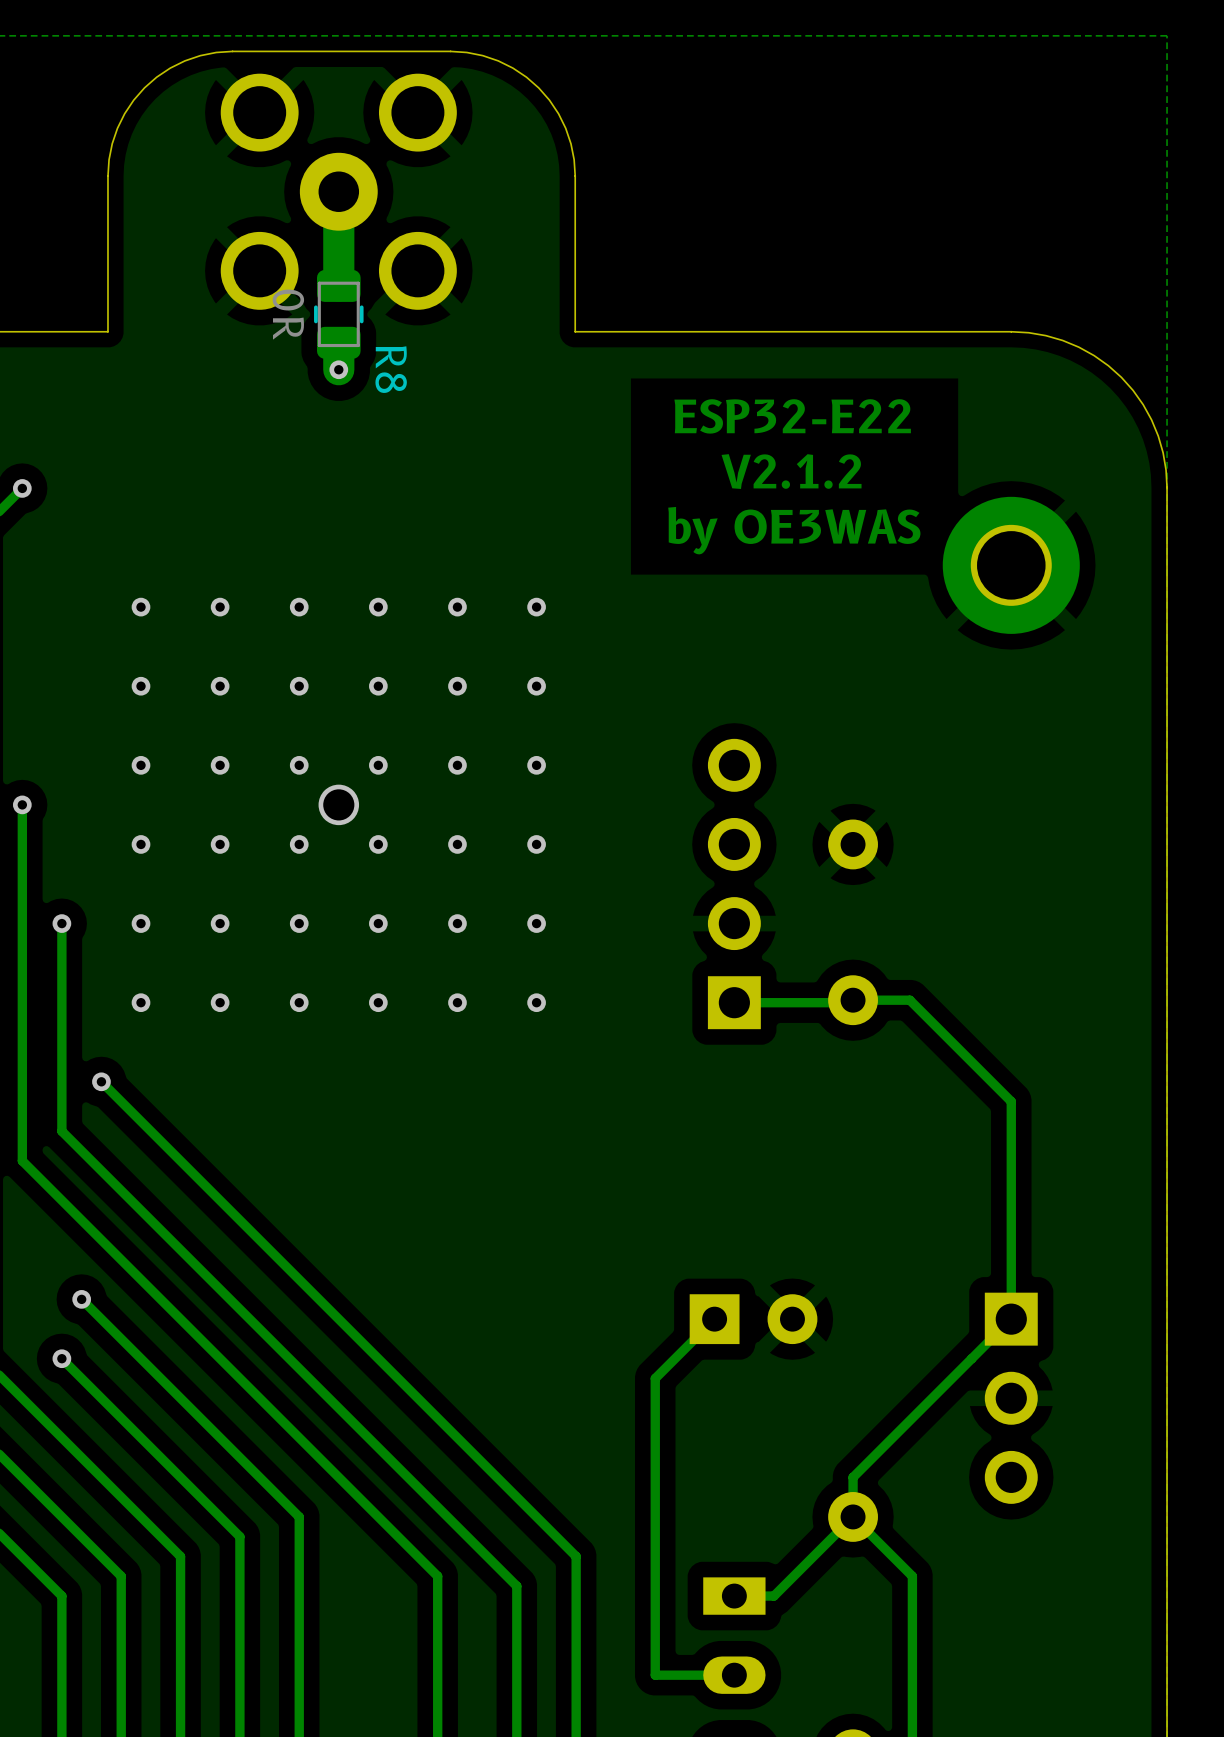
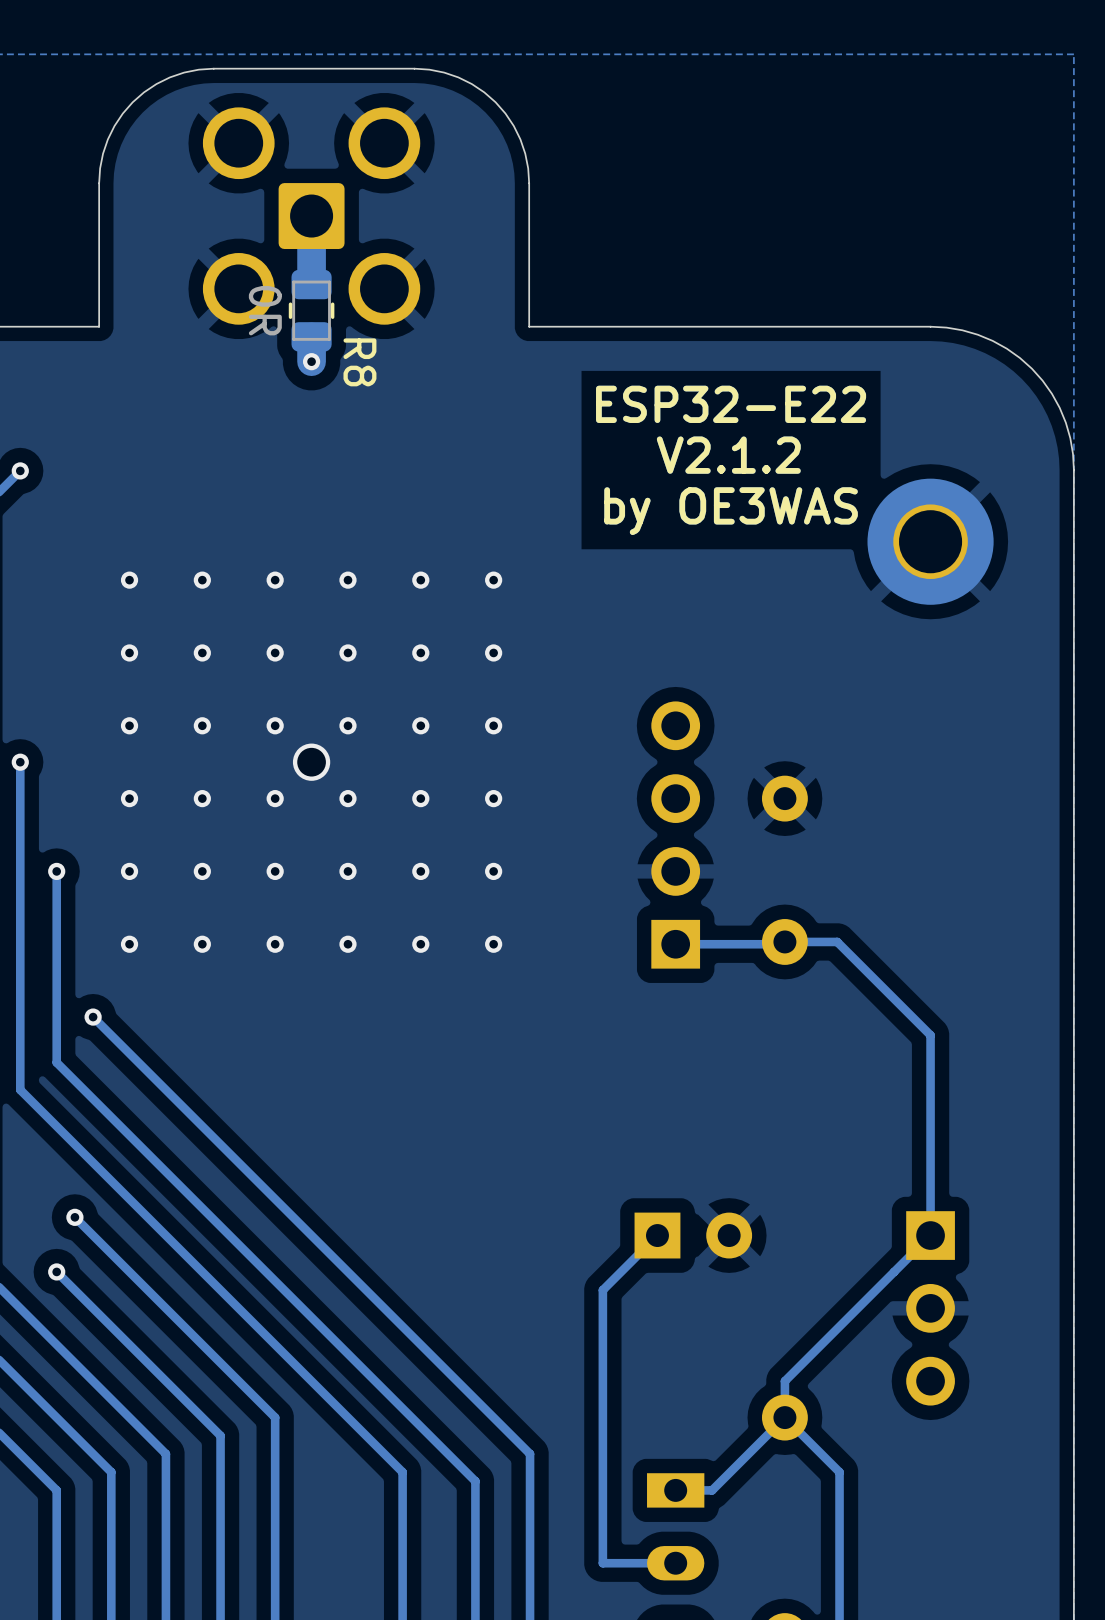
part footprint: [220, 73, 457, 310] -> [202, 107, 421, 325]
text: ESP32-E22 (792, 416) -> none
text: none -> ESP32-E22 (731, 404)
text: V2.1.2 (791, 471) -> none
text: none -> V2.1.2 (728, 455)
text: by OE3WAS (794, 530) -> none
text: none -> by OE3WAS (731, 511)

